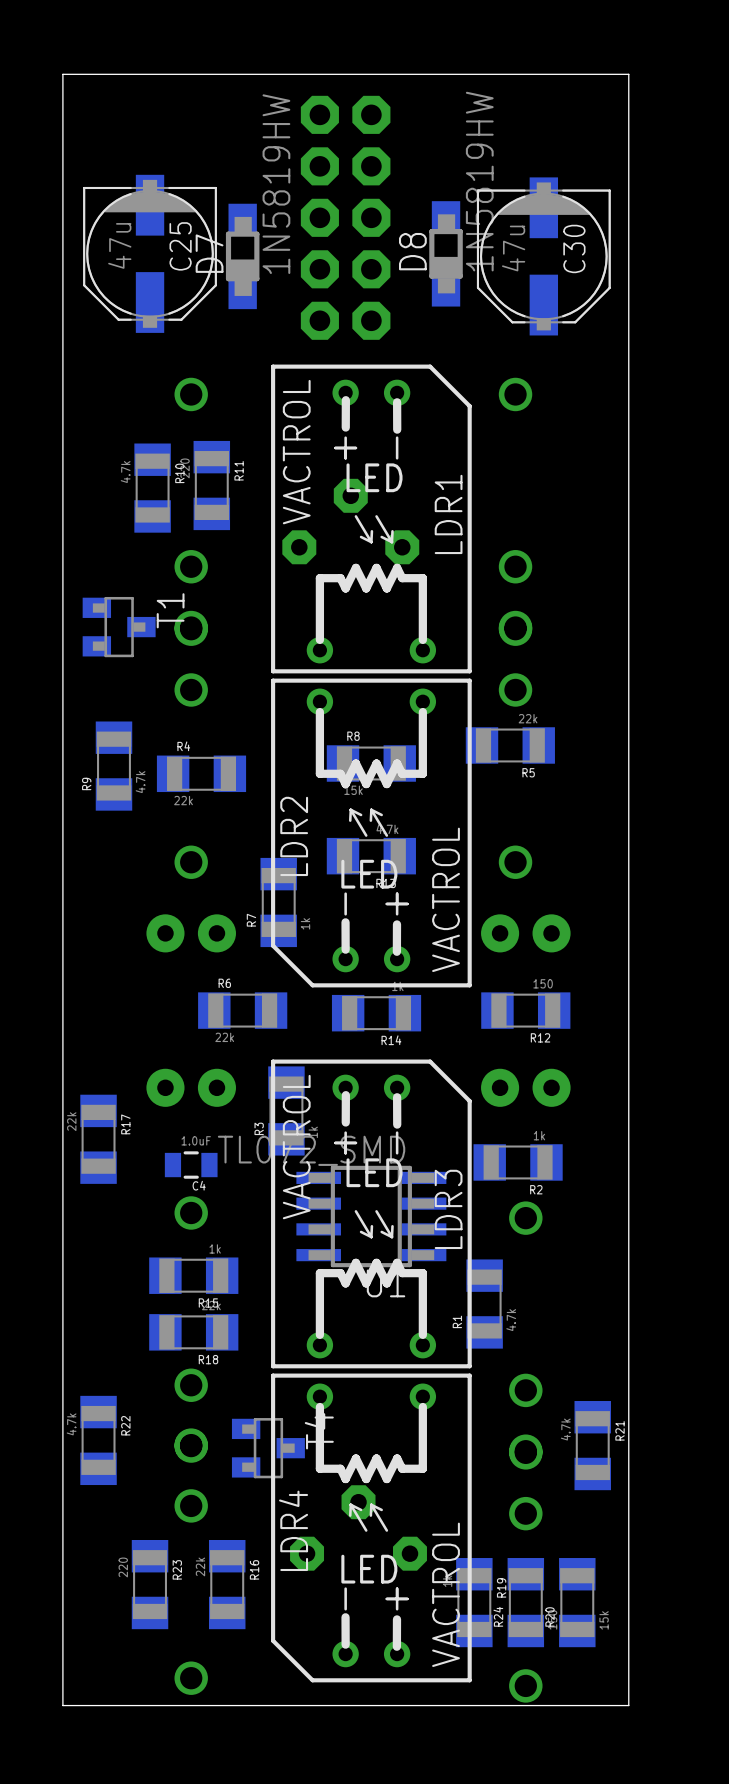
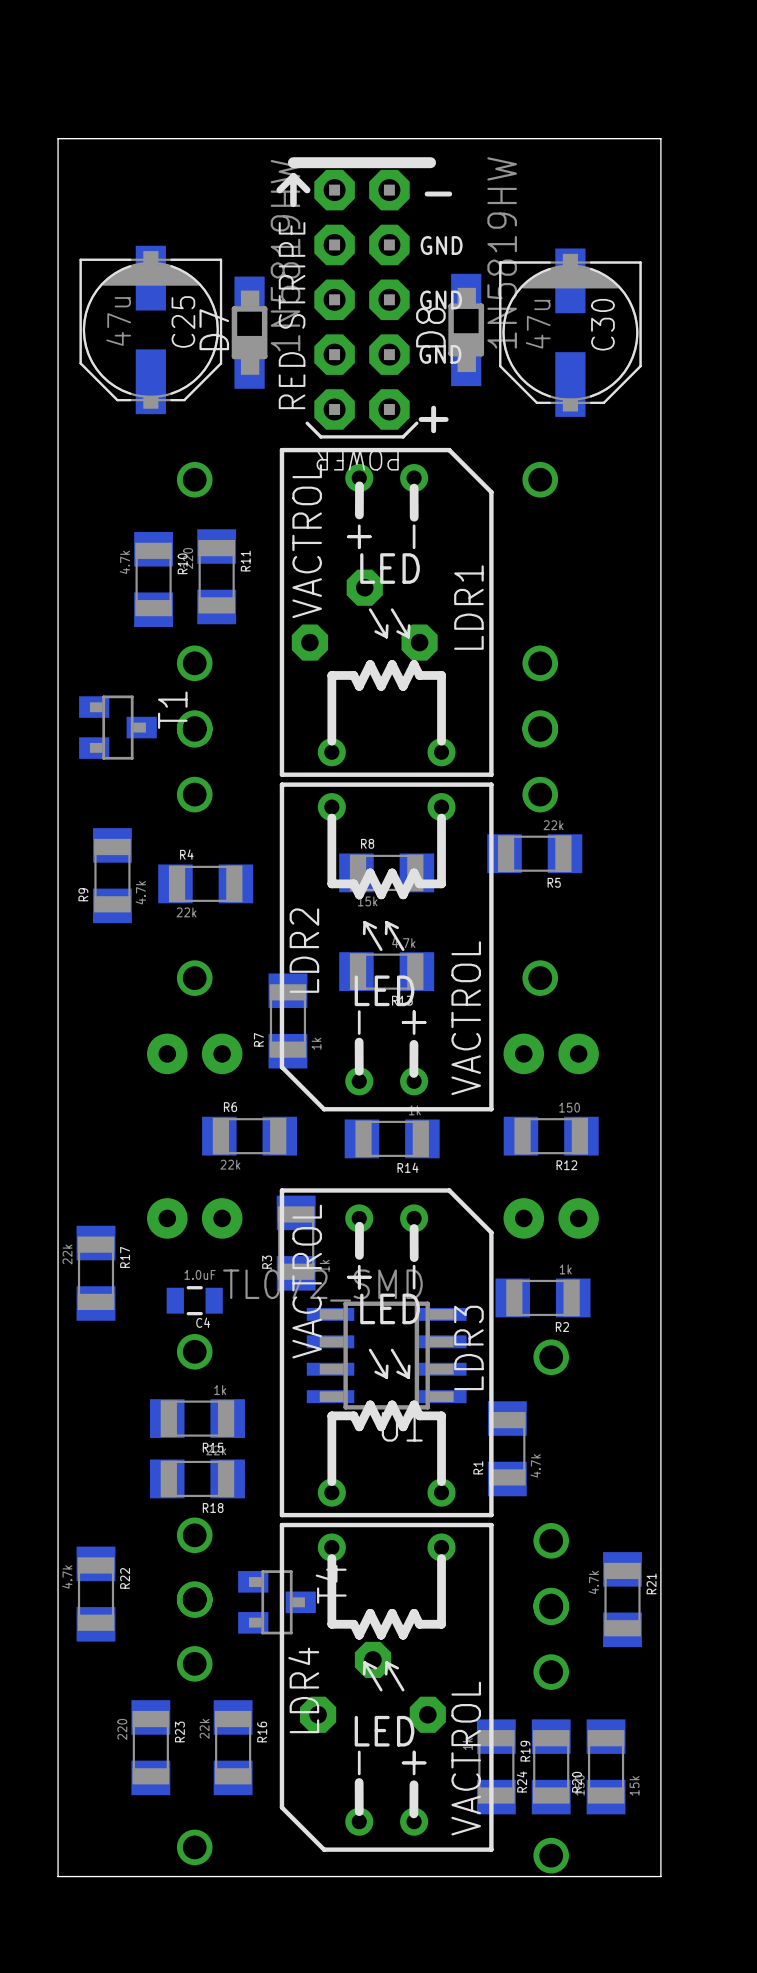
part side: top (345, 217) -> bottom (356, 297)

